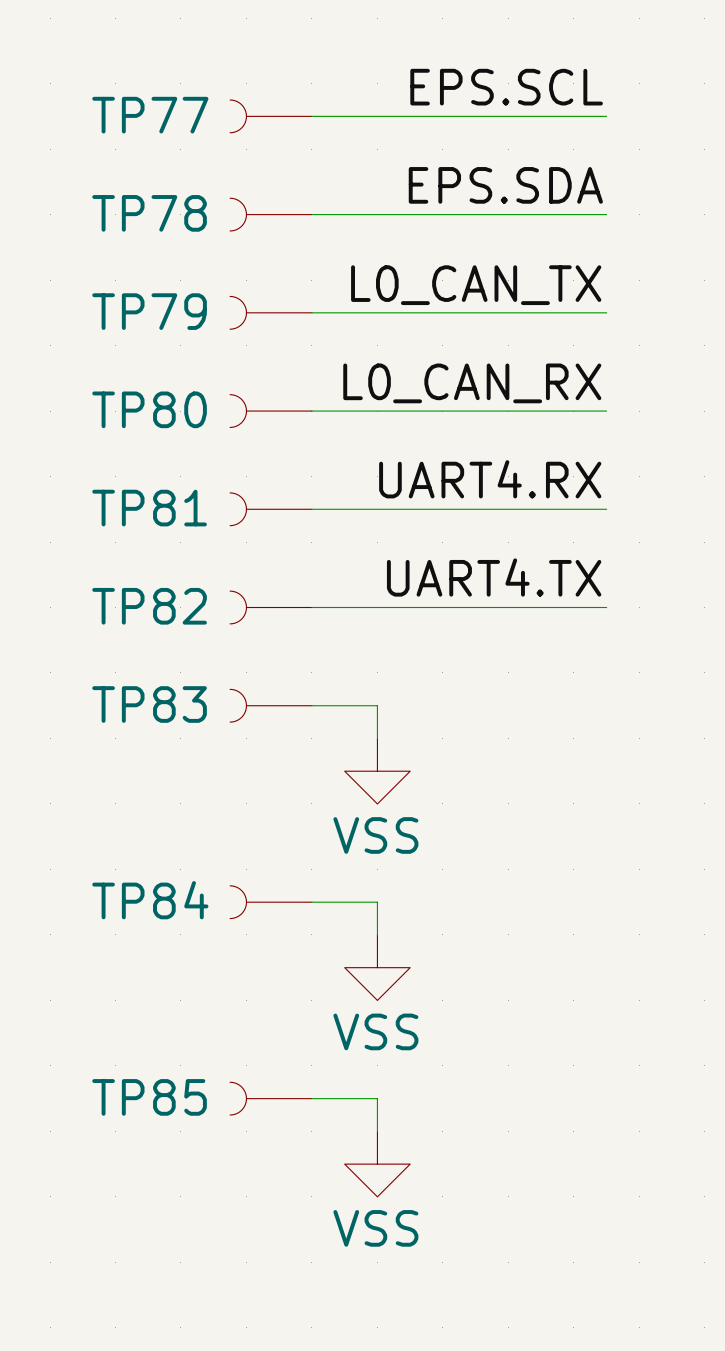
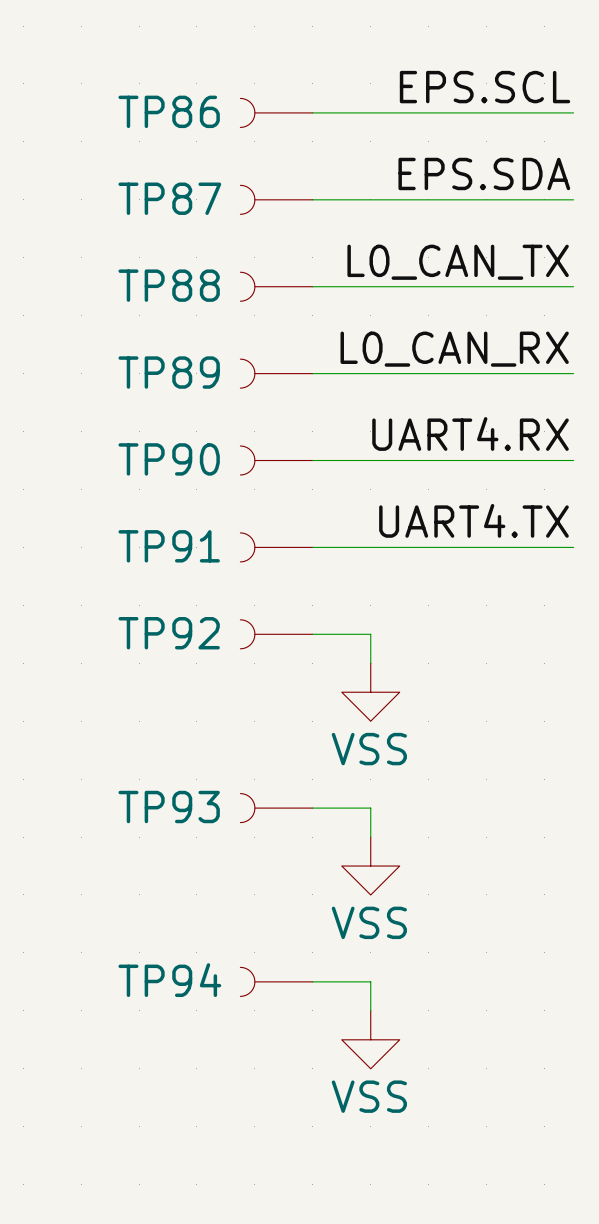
TP77 name: TP77 (150, 115) -> TP86 (169, 111)
TP78 name: TP78 (149, 213) -> TP87 (169, 198)
TP79 name: TP79 (149, 311) -> TP88 (169, 285)
TP80 name: TP80 (149, 409) -> TP89 (169, 372)
TP81 name: TP81 (149, 508) -> TP90 (169, 459)
TP82 name: TP82 (149, 606) -> TP91 (169, 546)
TP83 name: TP83 (149, 704) -> TP92 (169, 633)
TP84 name: TP84 (150, 900) -> TP93 (169, 807)
TP85 name: TP85 (149, 1097) -> TP94 (169, 980)

